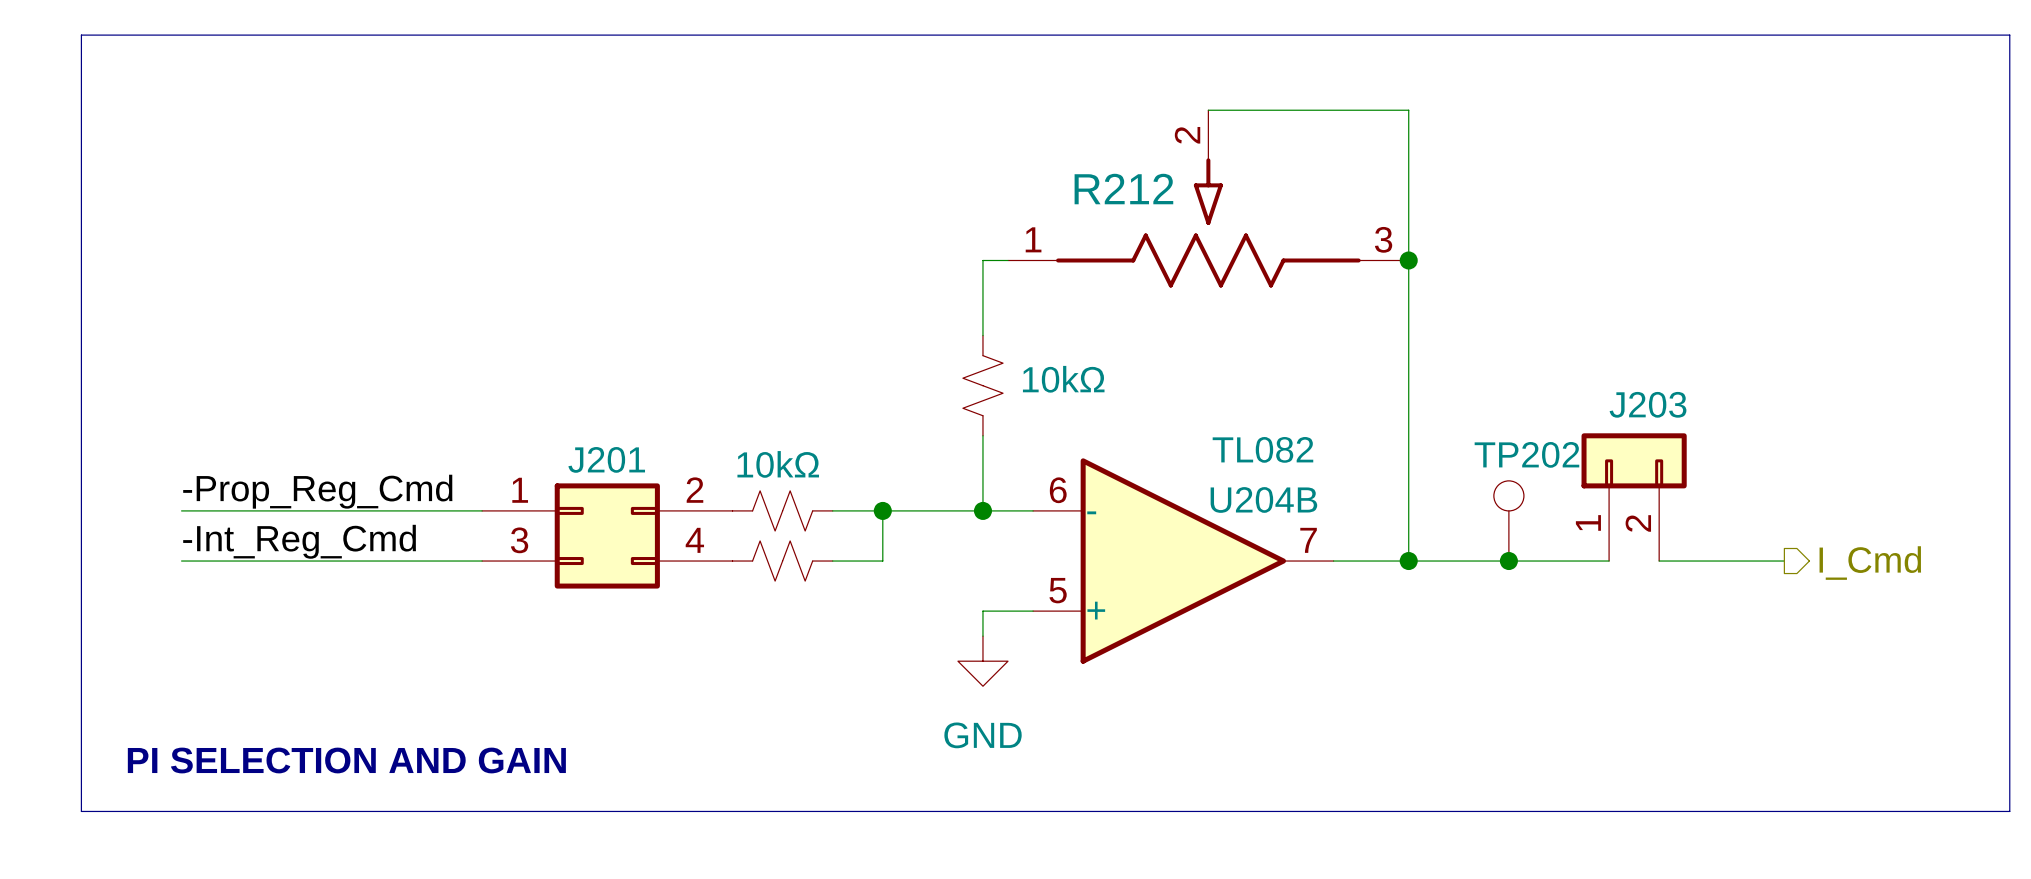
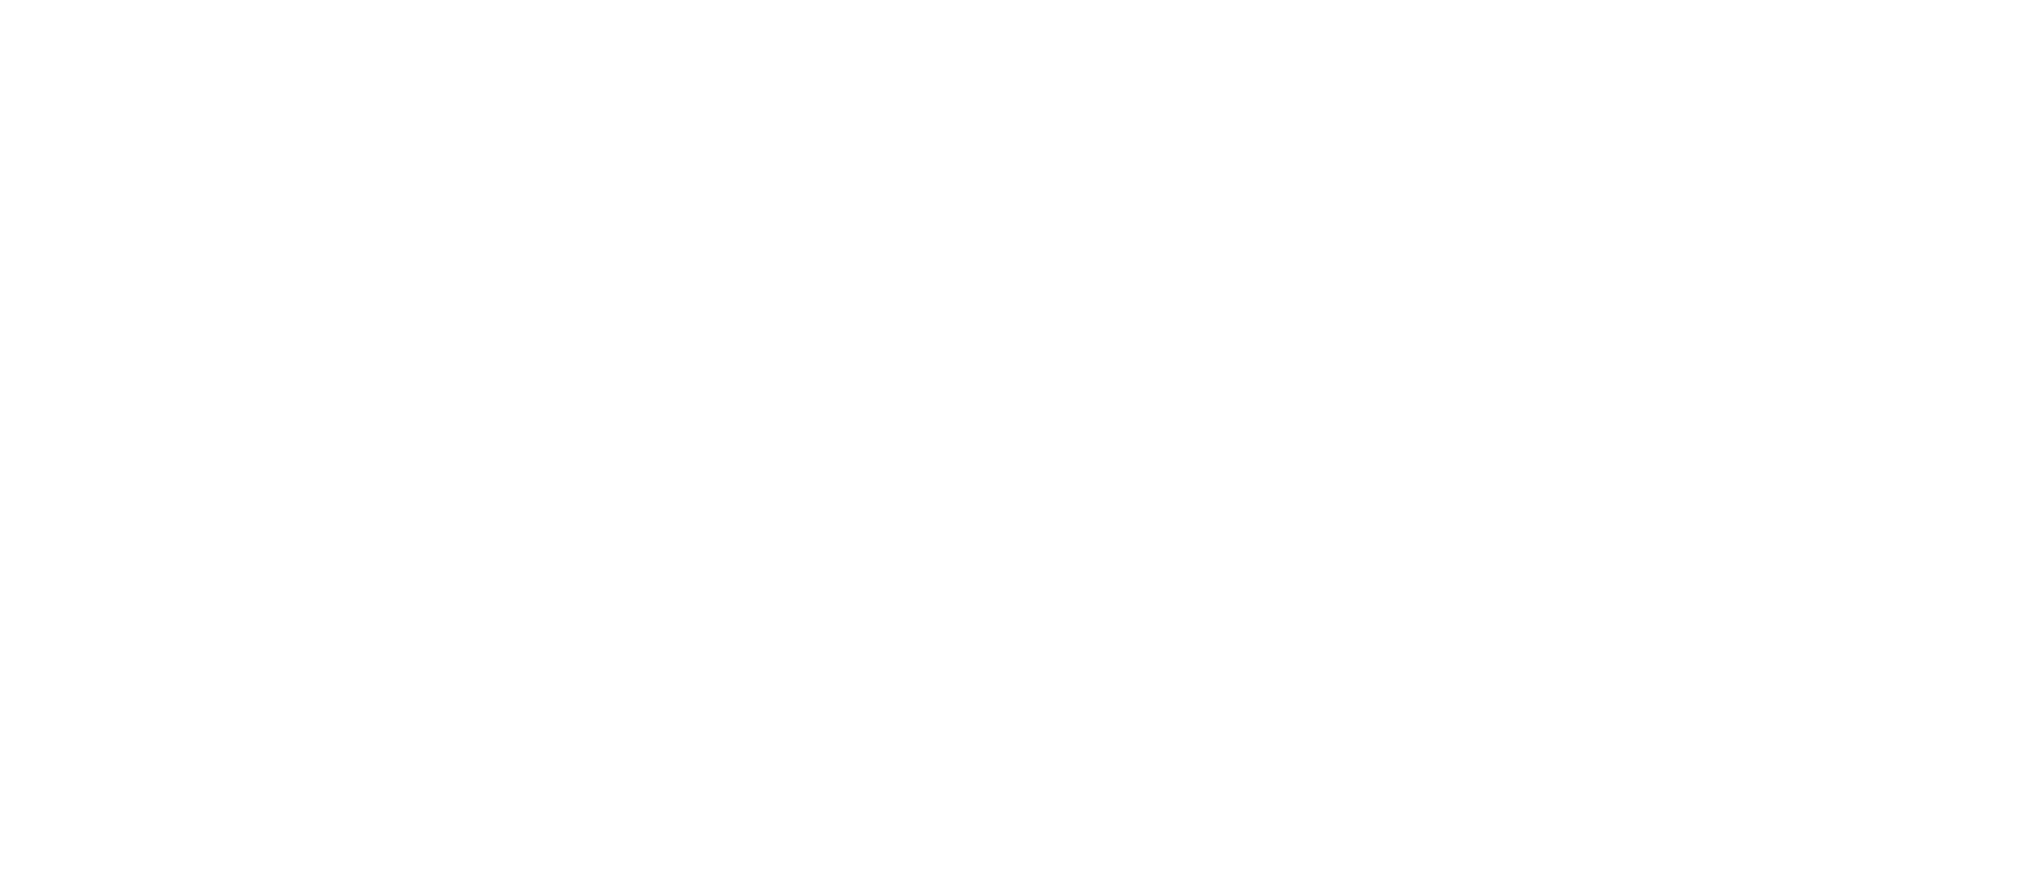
line: (81, 35) (2009, 35) (2009, 811) (81, 811) (81, 35) -> none
wire: (1208, 110) (1408, 110) (1408, 561) -> none
R212: (1208, 198) -> none
wire: (1008, 260) (982, 260) (982, 335) -> none
junction: (1408, 260) -> none
part: 10kΩ (982, 385) -> none
wire: (982, 435) (982, 510) -> none
label: -Prop_Reg_Cmd (317, 491) -> none
J203: (1634, 497) -> none
wire: (181, 510) (482, 510) -> none
part: 10kΩ (782, 510) -> none
wire: (832, 510) (1033, 510) -> none
wire: (882, 510) (882, 561) (832, 561) -> none
junction: (882, 510) -> none
junction: (982, 510) -> none
TP202: (1508, 520) -> none
J201: (607, 535) -> none
label: -Int_Reg_Cmd (299, 541) -> none
wire: (181, 561) (482, 561) -> none
part: (782, 561) -> none
U204B: TL082 (1183, 561) -> none
wire: (1333, 561) (1609, 561) -> none
junction: (1408, 561) -> none
junction: (1508, 561) -> none
wire: (1659, 561) (1784, 561) -> none
hierarchical label: I_Cmd (1870, 563) -> none
wire: (1033, 611) (982, 611) (982, 636) -> none
power symbol: GND (982, 661) -> none
text: PI SELECTION AND GAIN (346, 760) -> none

